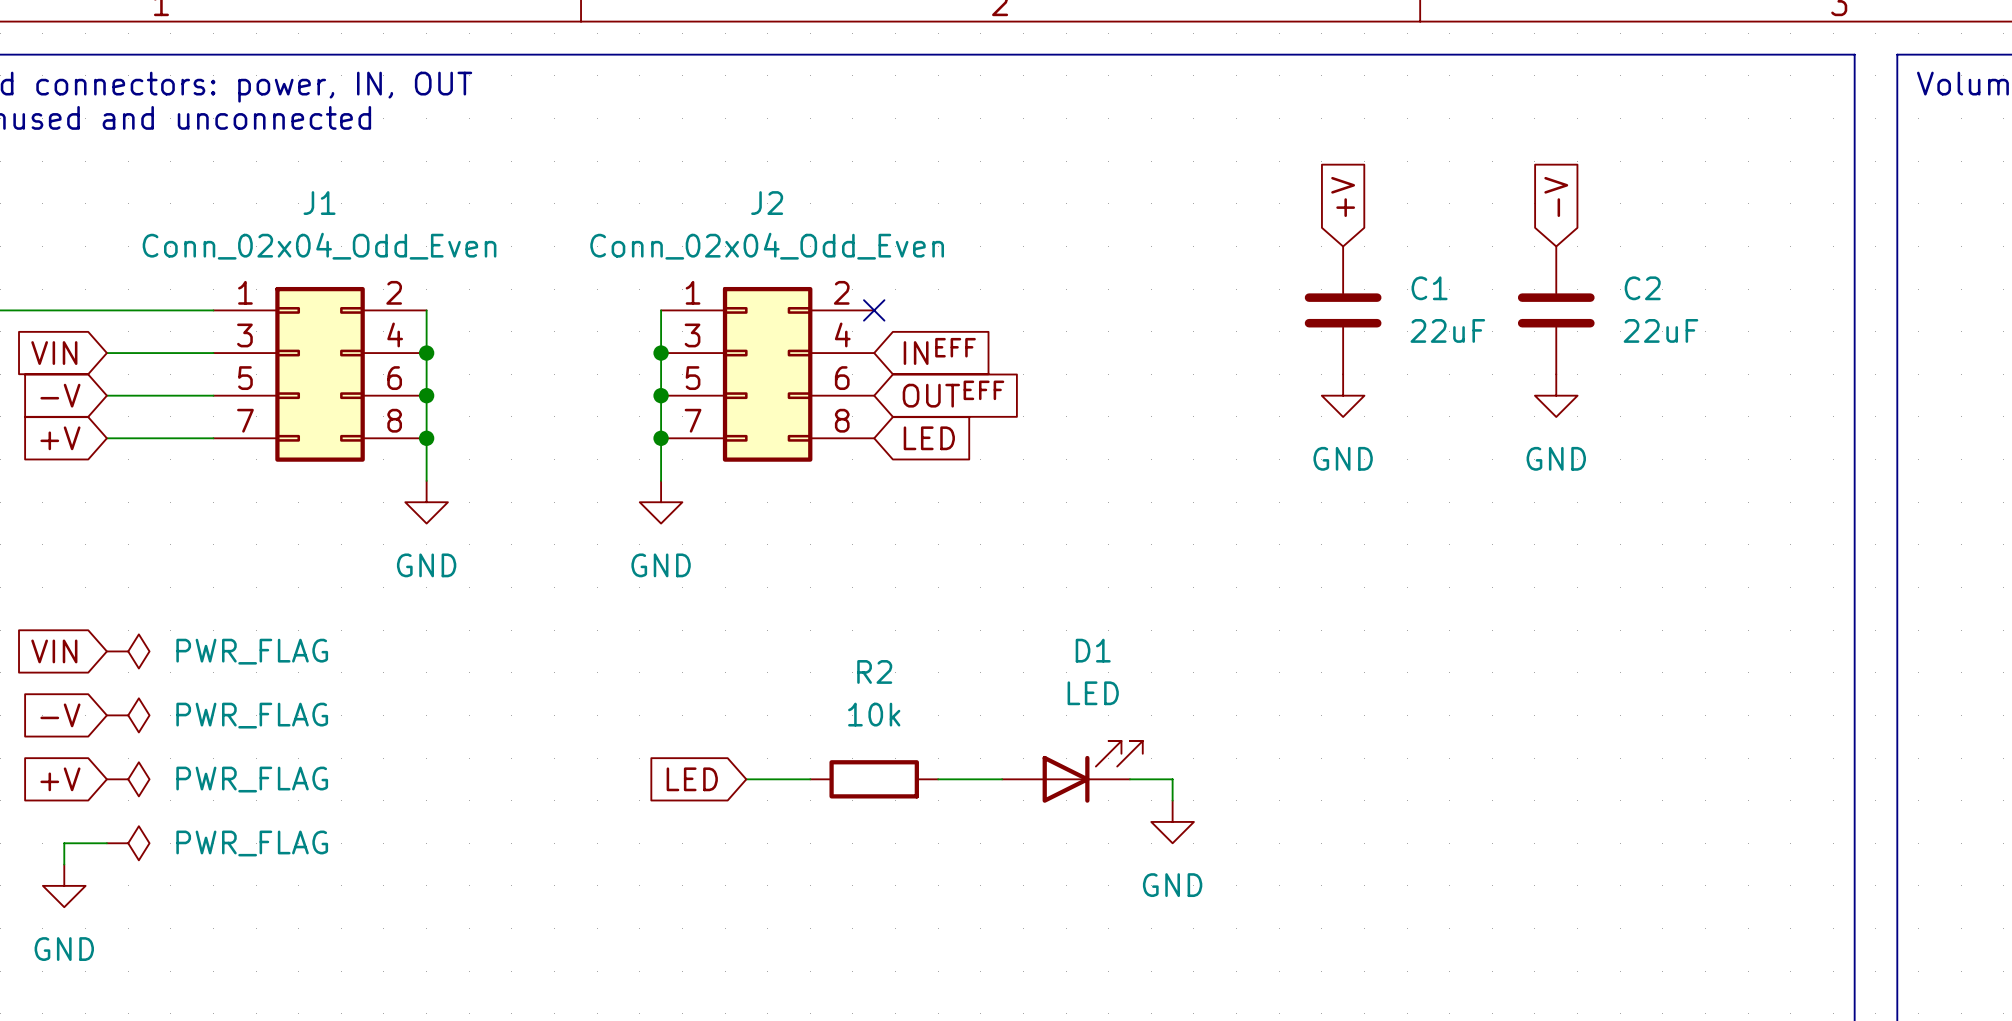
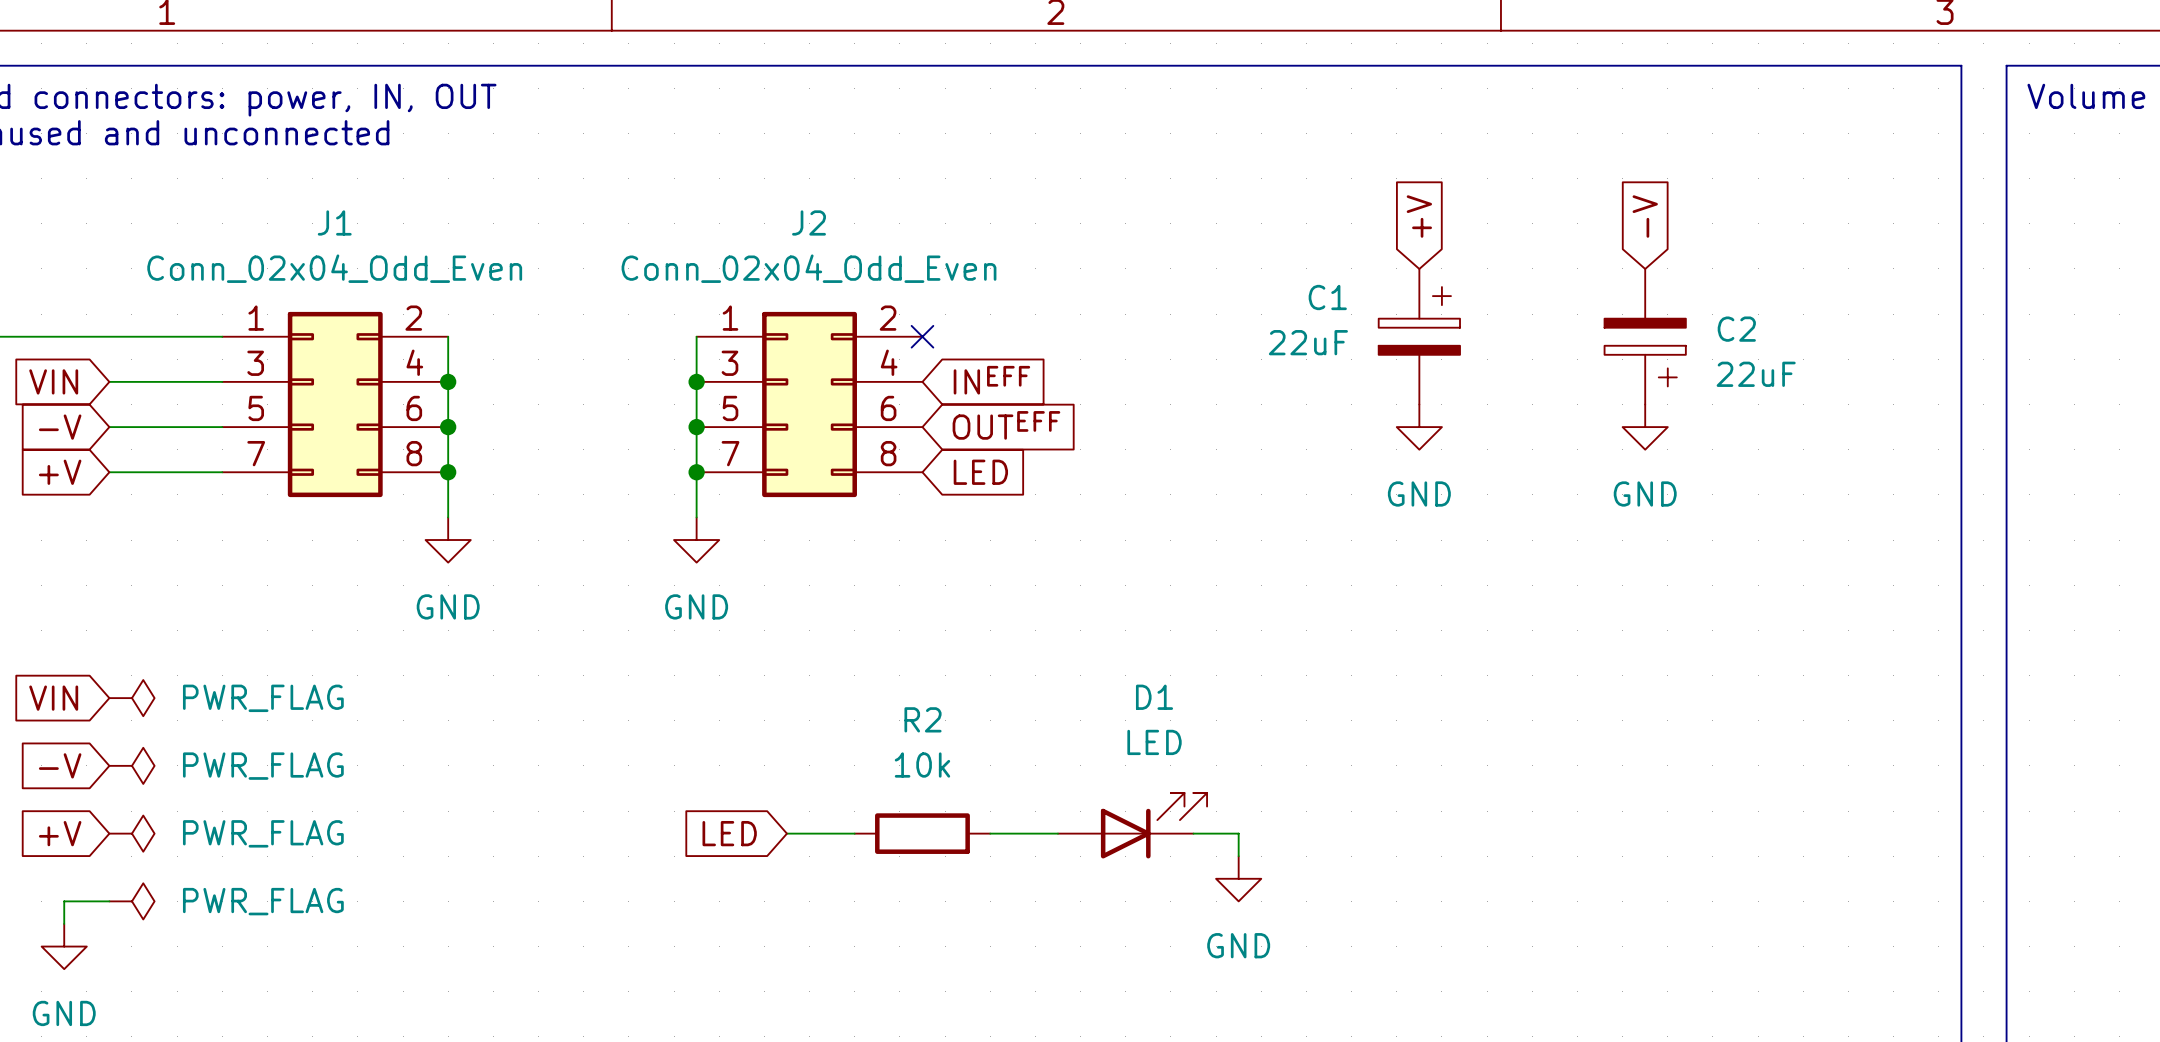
C1 symbol: [1304, 246, 1382, 375] -> [1378, 268, 1461, 405]
C2 symbol: [1517, 246, 1595, 375] -> [1604, 268, 1686, 405]
C1 name position: C1 (1429, 288) -> C1 (1327, 297)
C1 value position: 22uF (1447, 330) -> 22uF (1308, 342)

